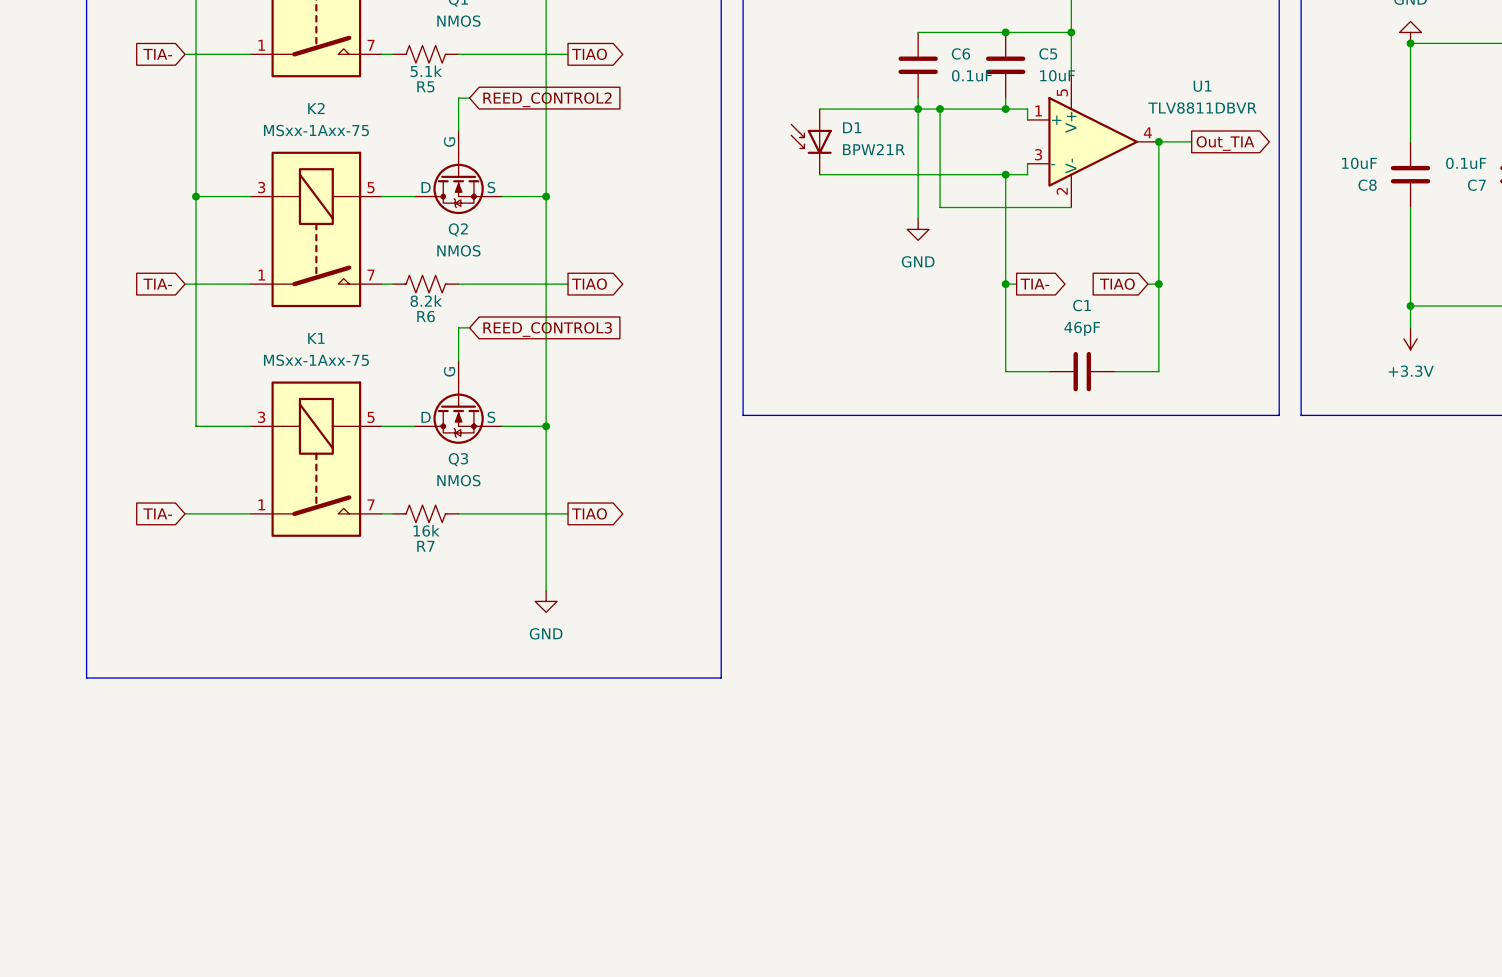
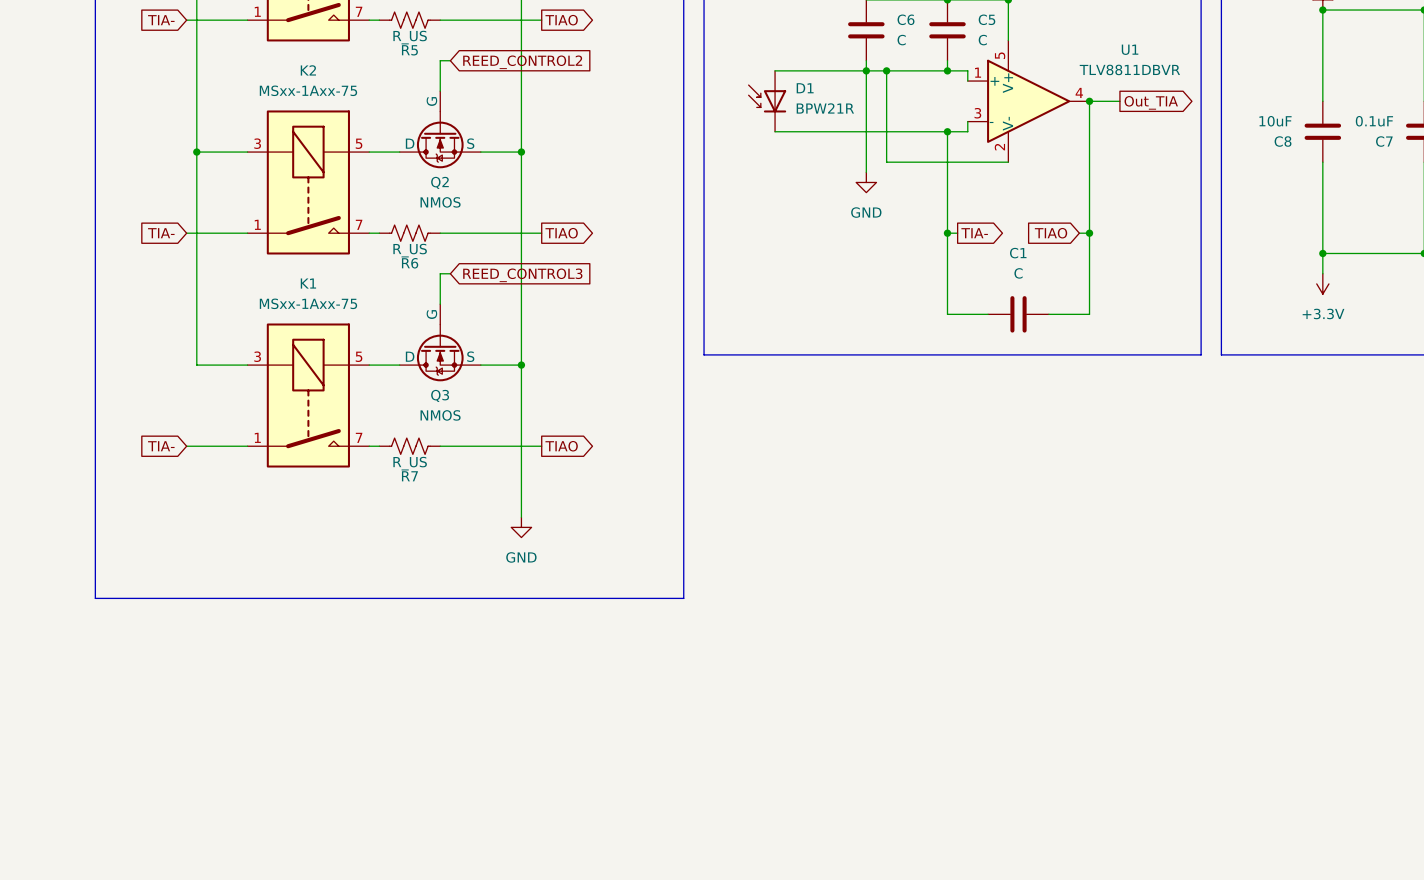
R5 value: 5.1k (426, 71) -> R_US (410, 37)
C6 value: 0.1uF (972, 75) -> C (901, 40)
C5 value: 10uF (1057, 75) -> C (982, 40)
R6 value: 8.2k (426, 301) -> R_US (410, 250)
C1 value: 46pF (1082, 328) -> C (1018, 273)
R7 value: 16k (426, 530) -> R_US (410, 463)

